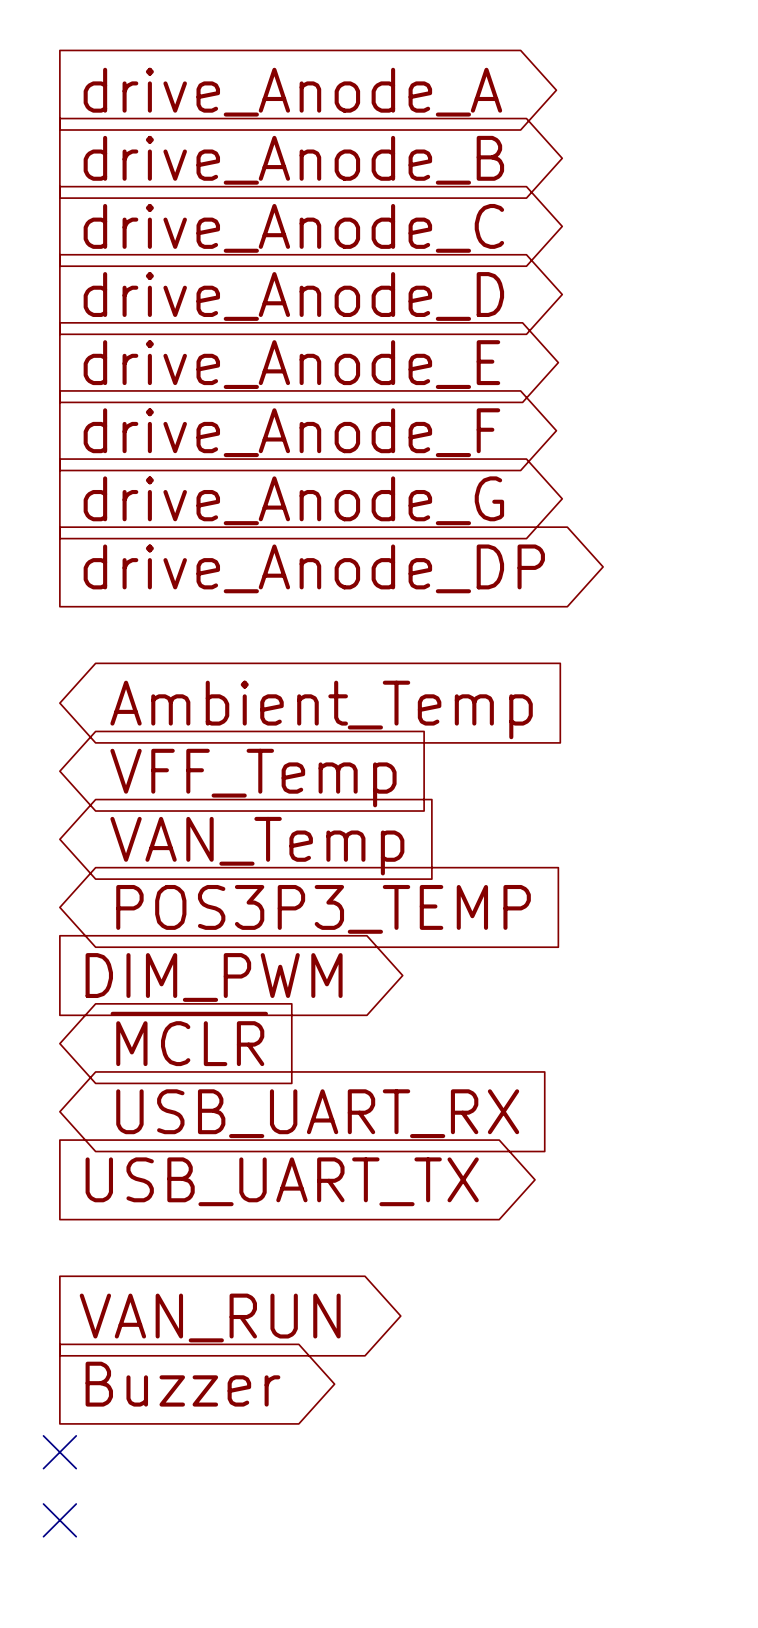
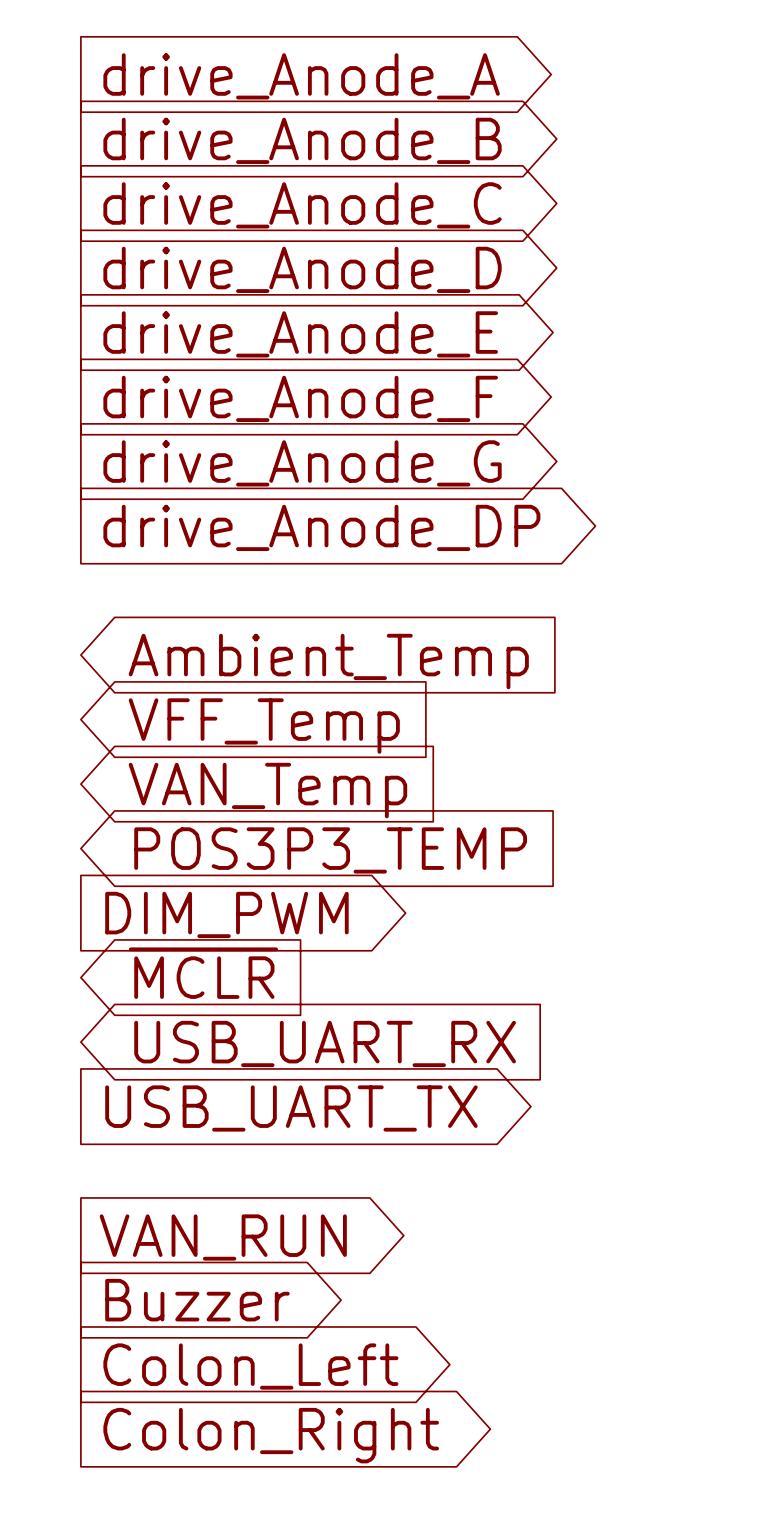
no-connect mark: (59, 1452) -> none
global label: none -> Colon_Left (250, 1366)
no-connect mark: (59, 1520) -> none
global label: none -> Colon_Right (271, 1435)

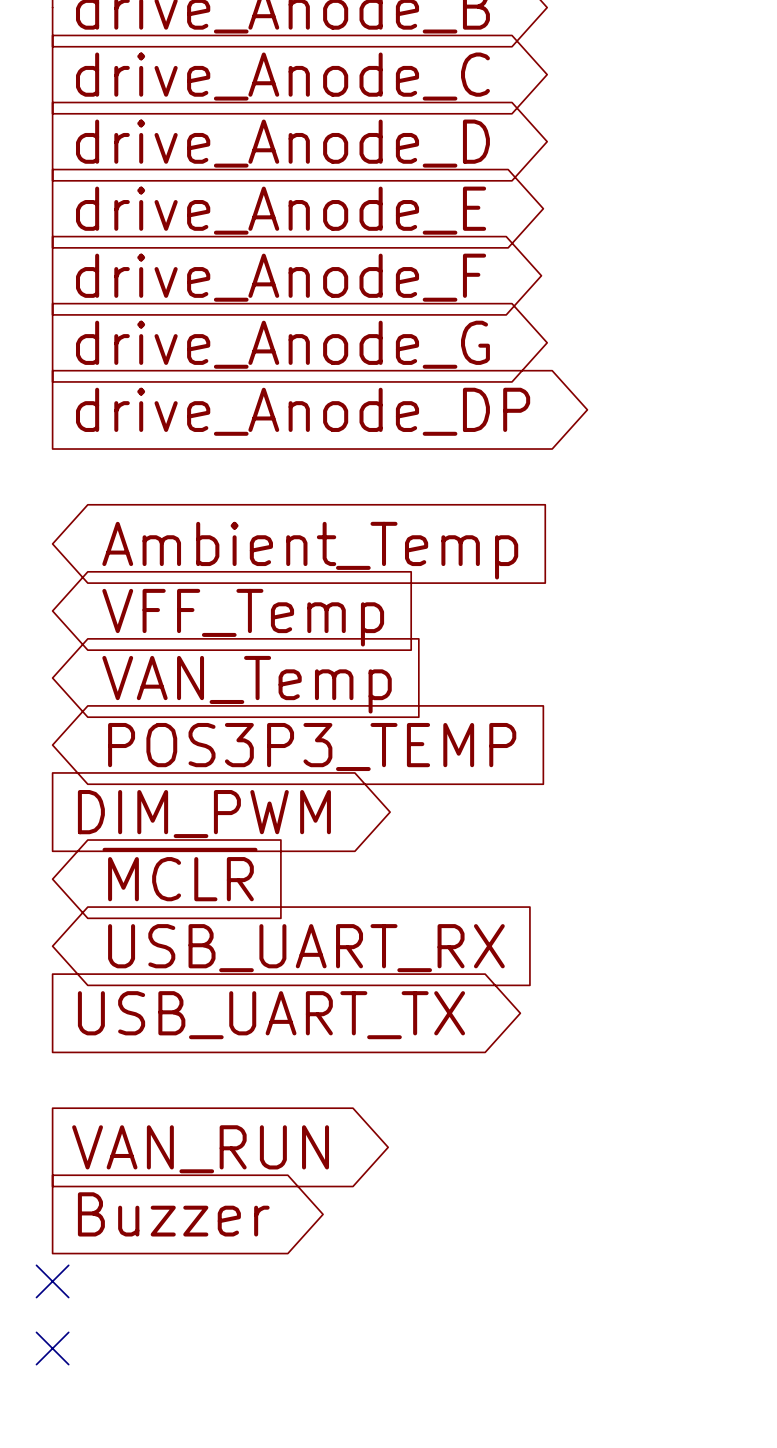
no-connect mark: none -> (52, 1281)
global label: Colon_Left (250, 1366) -> none
no-connect mark: none -> (52, 1348)
global label: Colon_Right (271, 1435) -> none

